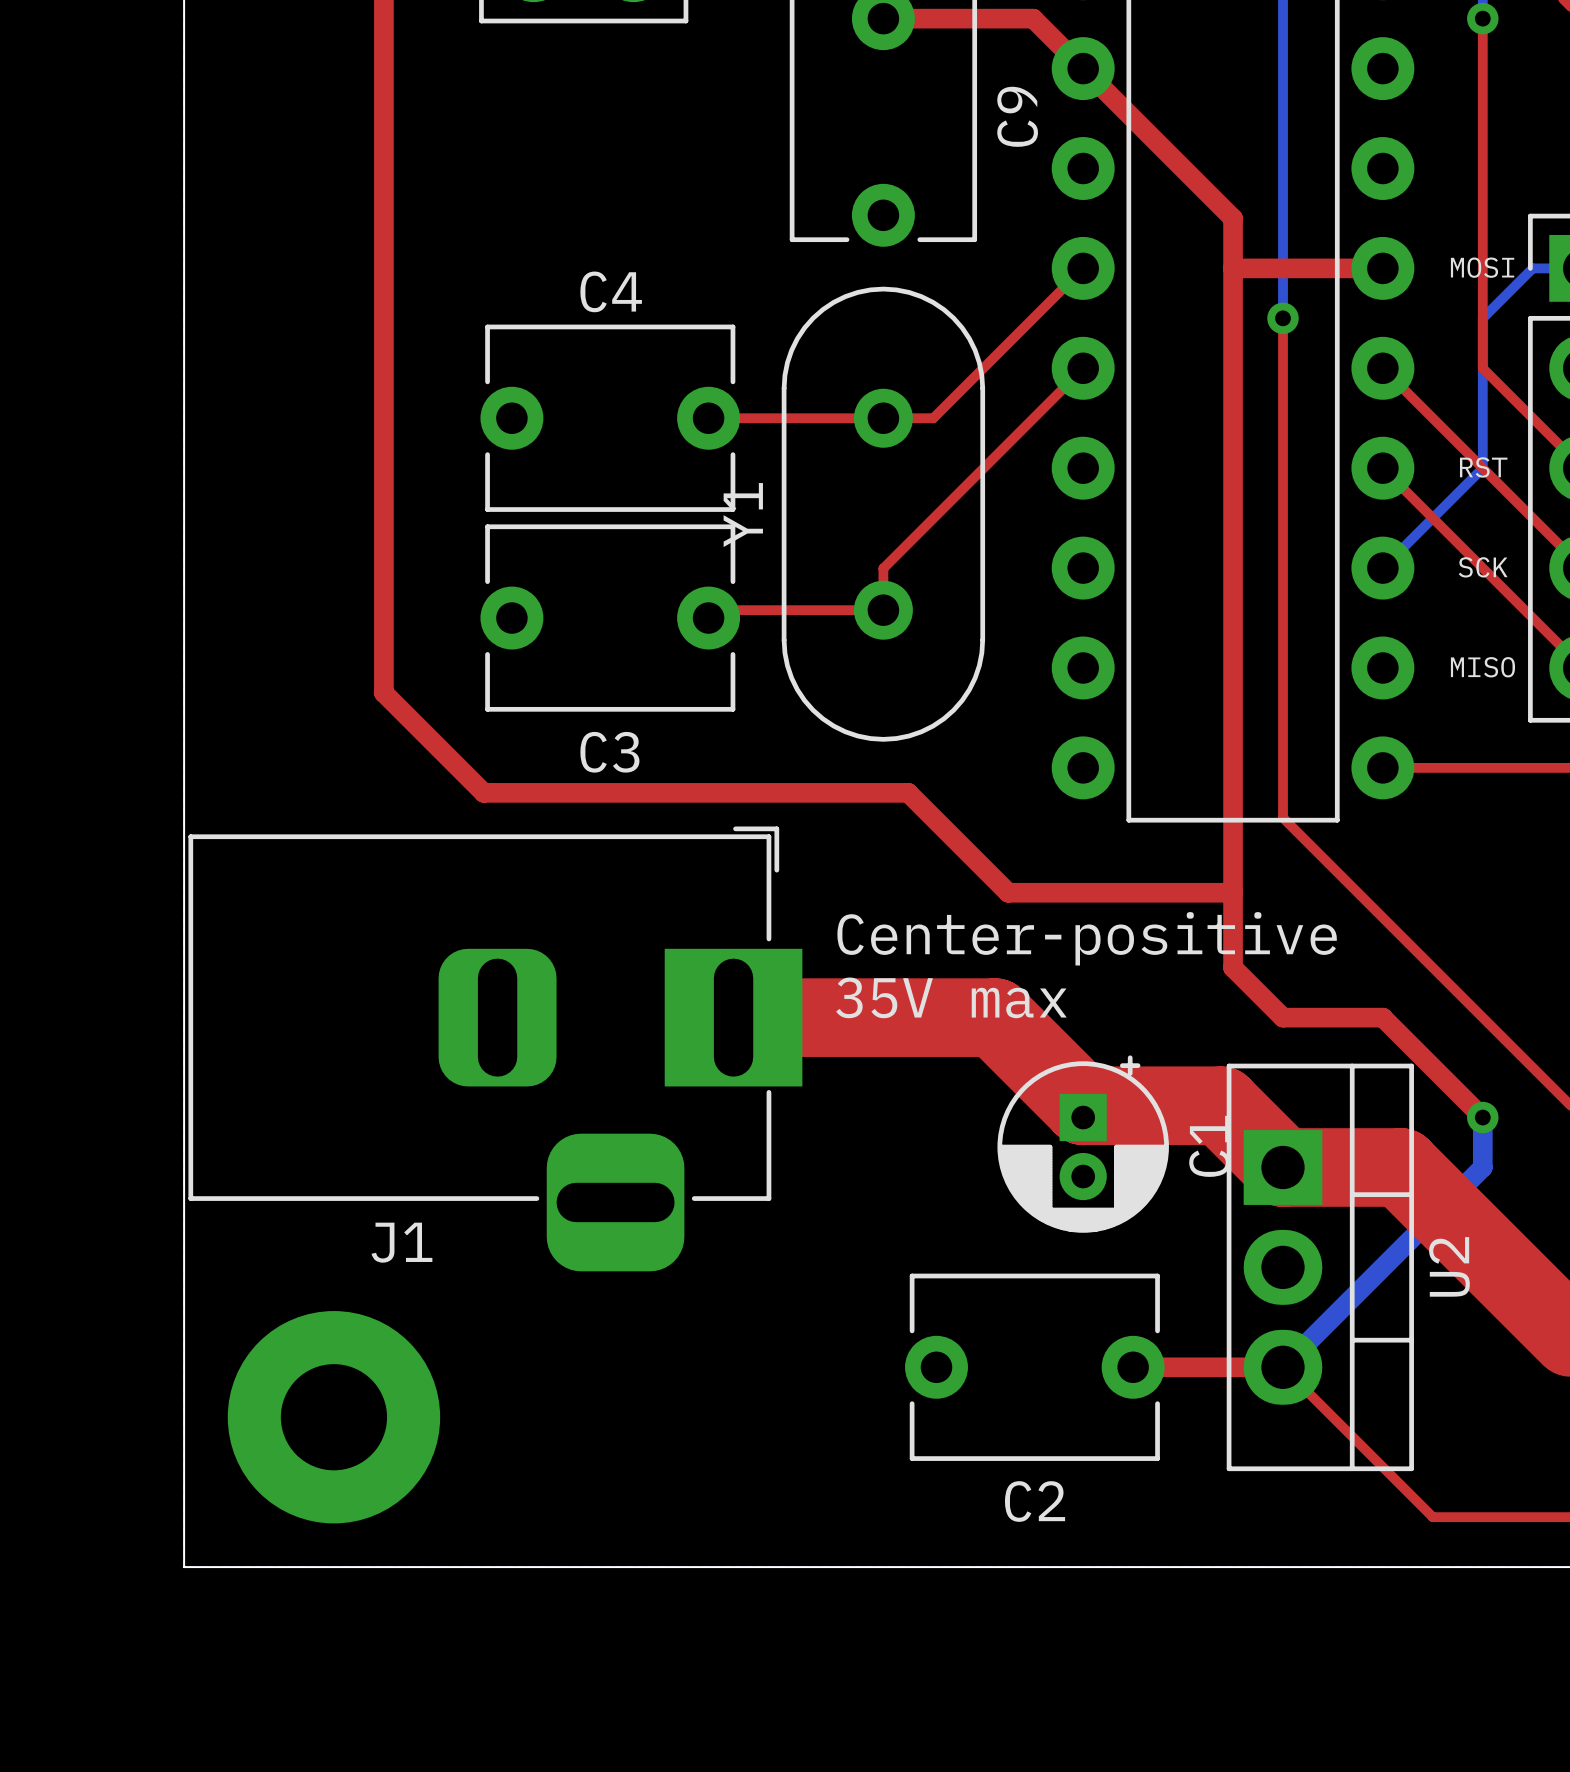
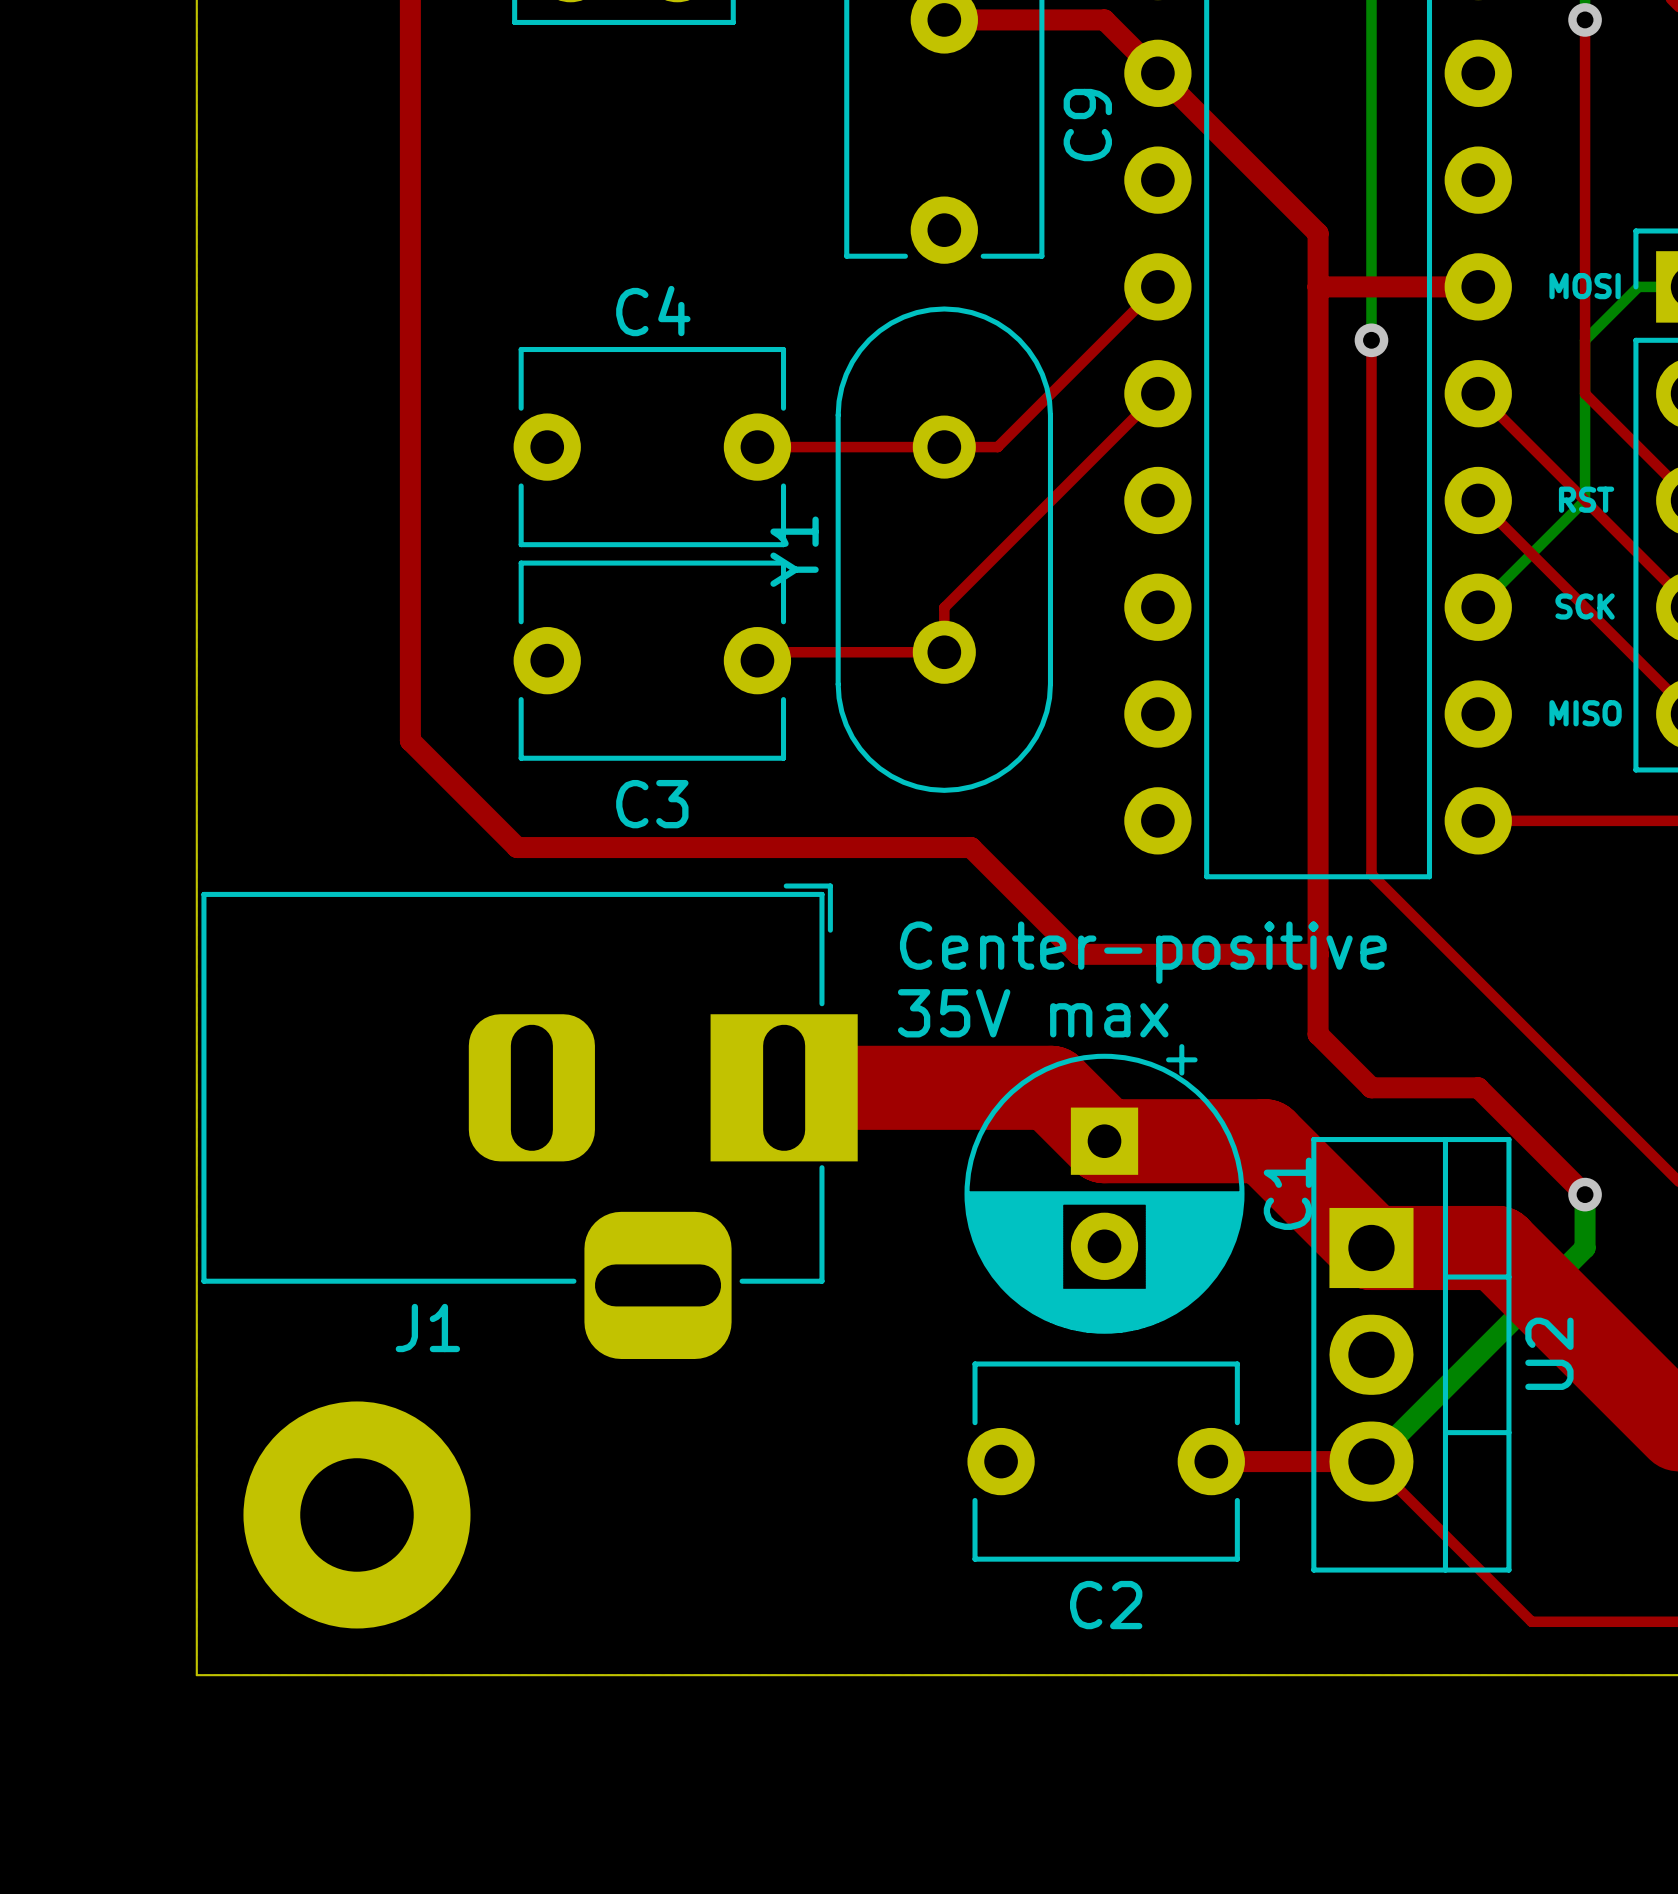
text: none -> Center-positive (1143, 952)
text: Center-positive (1087, 938) -> 35V max (1033, 1013)
text: 35V max (951, 997) -> none
top track: (983, 1017) (995, 1017) (1083, 1105) (1221, 1105) -> (1051, 1087) (1104, 1141) (1264, 1141) (1305, 1181)
C1 footprint: [997, 1055, 1169, 1233] -> [964, 1044, 1245, 1334]

